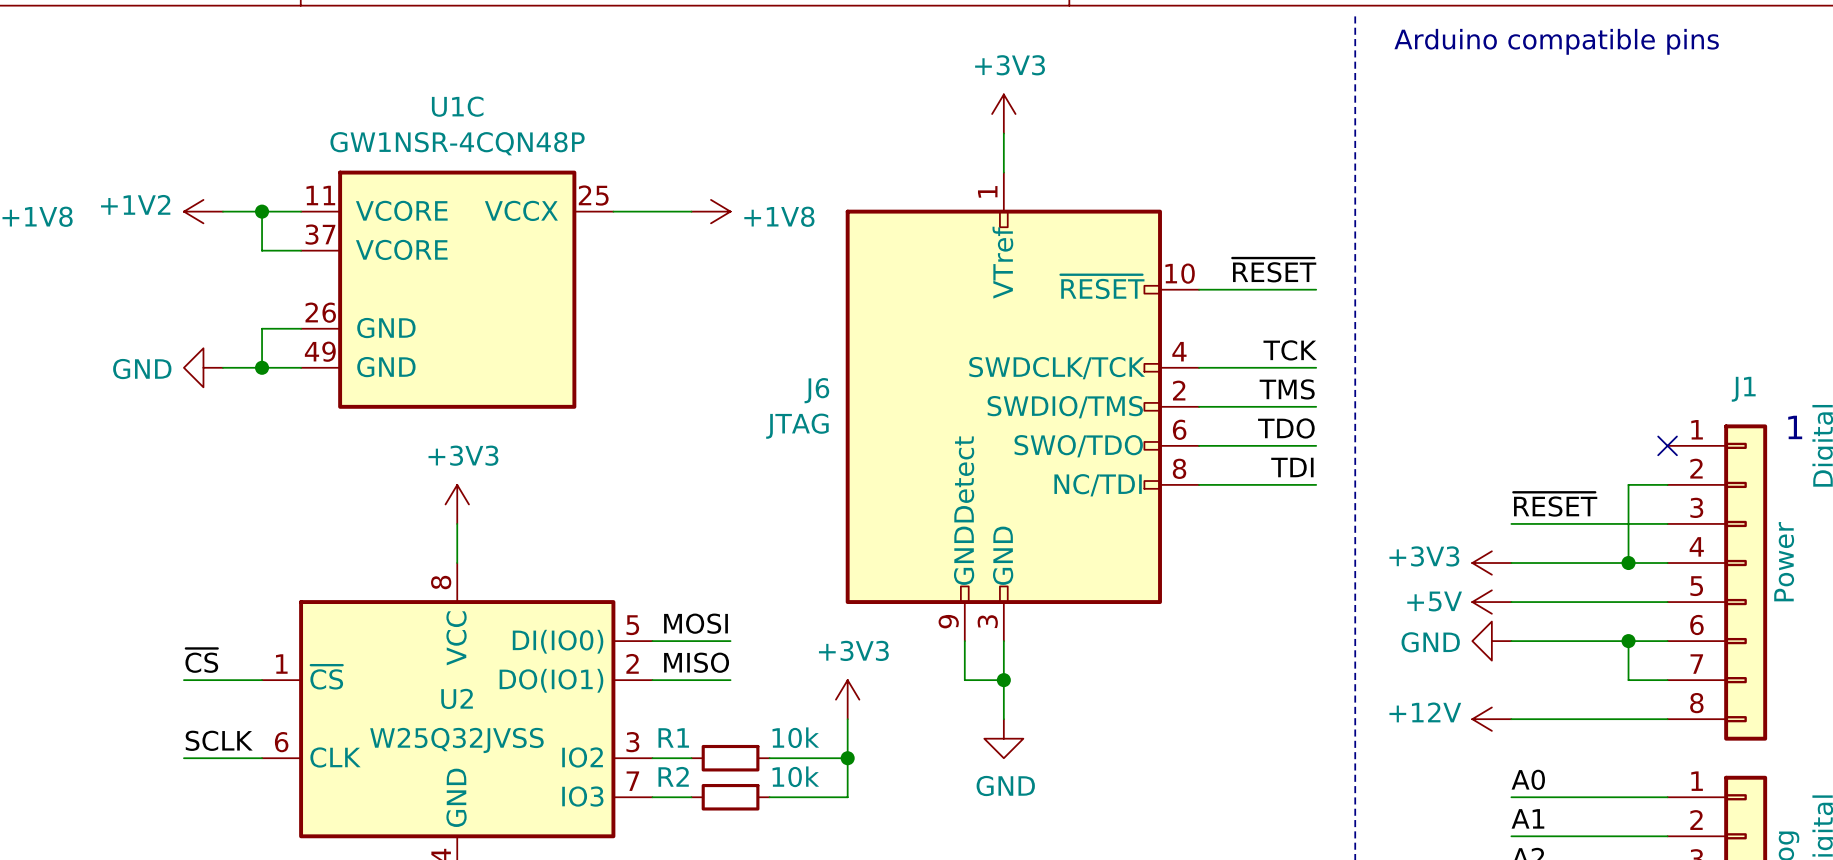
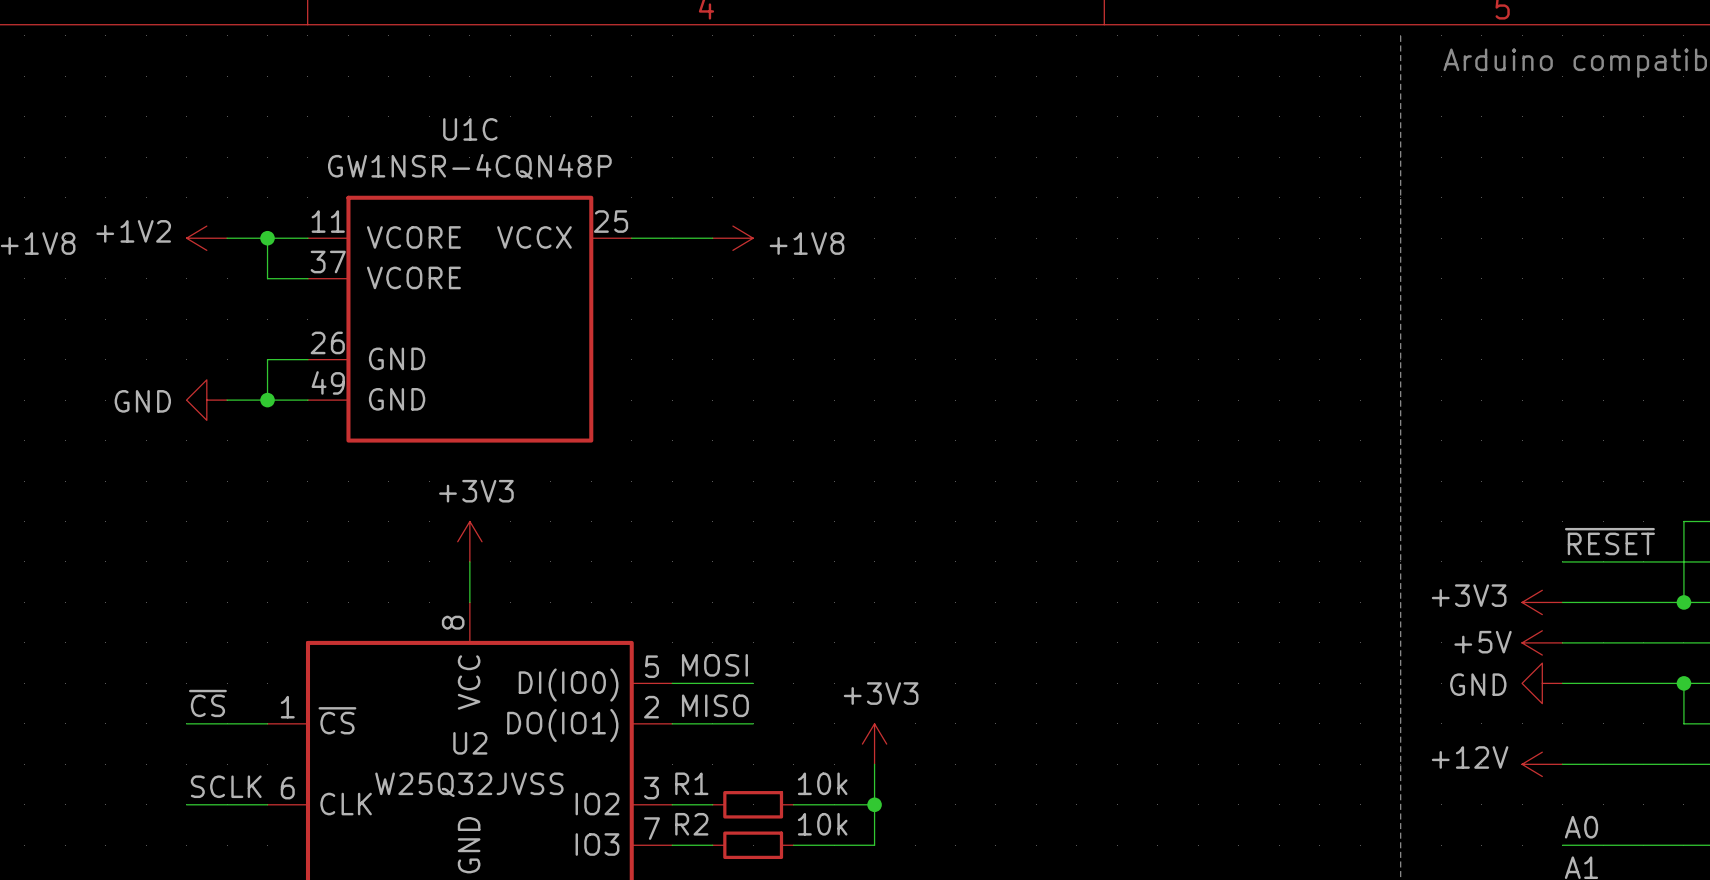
power symbol: +3V3 (1003, 114) -> none
wire: (1003, 133) (1003, 172) -> none
label: ~{RESET} (1274, 270) -> none
wire: (1199, 289) (1316, 289) -> none
label: TCK (1290, 350) -> none
wire: (1199, 367) (1316, 367) -> none
label: TMS (1287, 389) -> none
J6: JTAG (1022, 406) -> none
wire: (1199, 406) (1316, 406) -> none
label: TDO (1286, 428) -> none
wire: (1199, 445) (1316, 445) -> none
label: TDI (1292, 467) -> none
wire: (1199, 484) (1316, 484) -> none
wire: (964, 641) (964, 680) (1003, 680) -> none
wire: (1003, 641) (1003, 719) -> none
junction: (1003, 680) -> none
power symbol: GND (1003, 738) -> none

